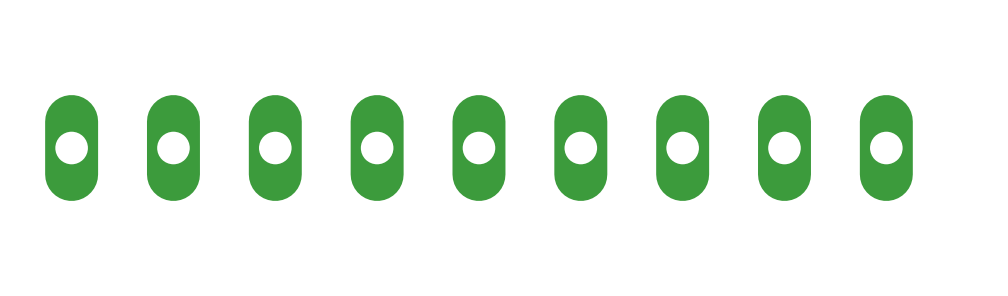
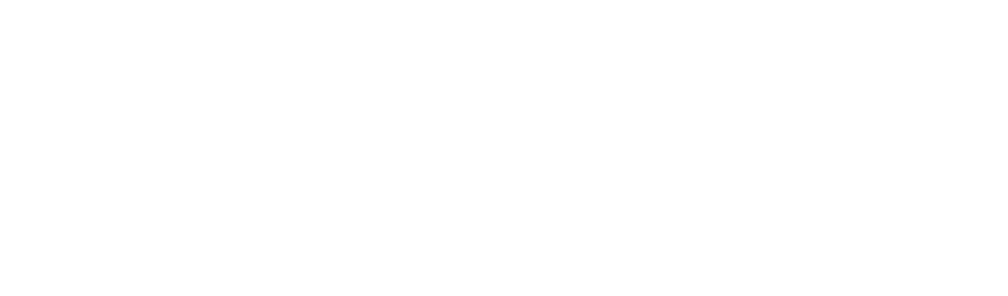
part: (173, 148) -> none
part: (478, 148) -> none
part: (784, 148) -> none

